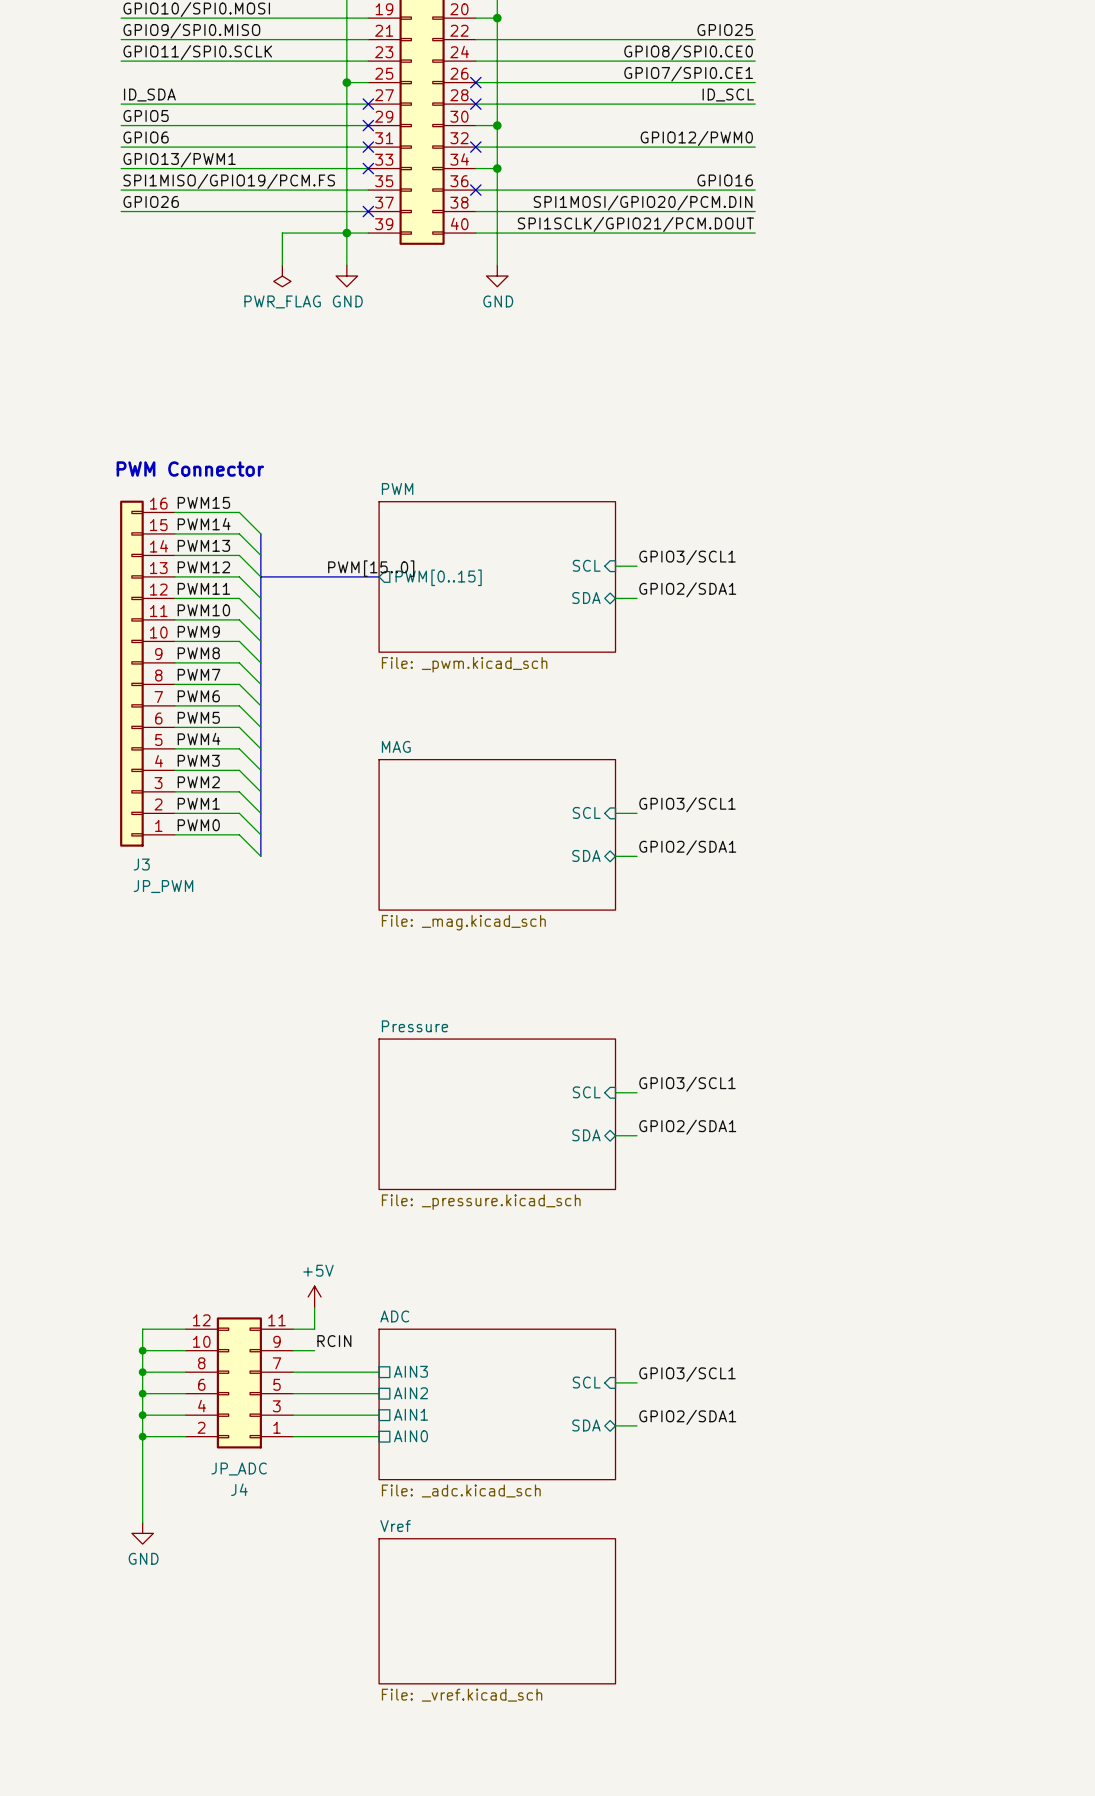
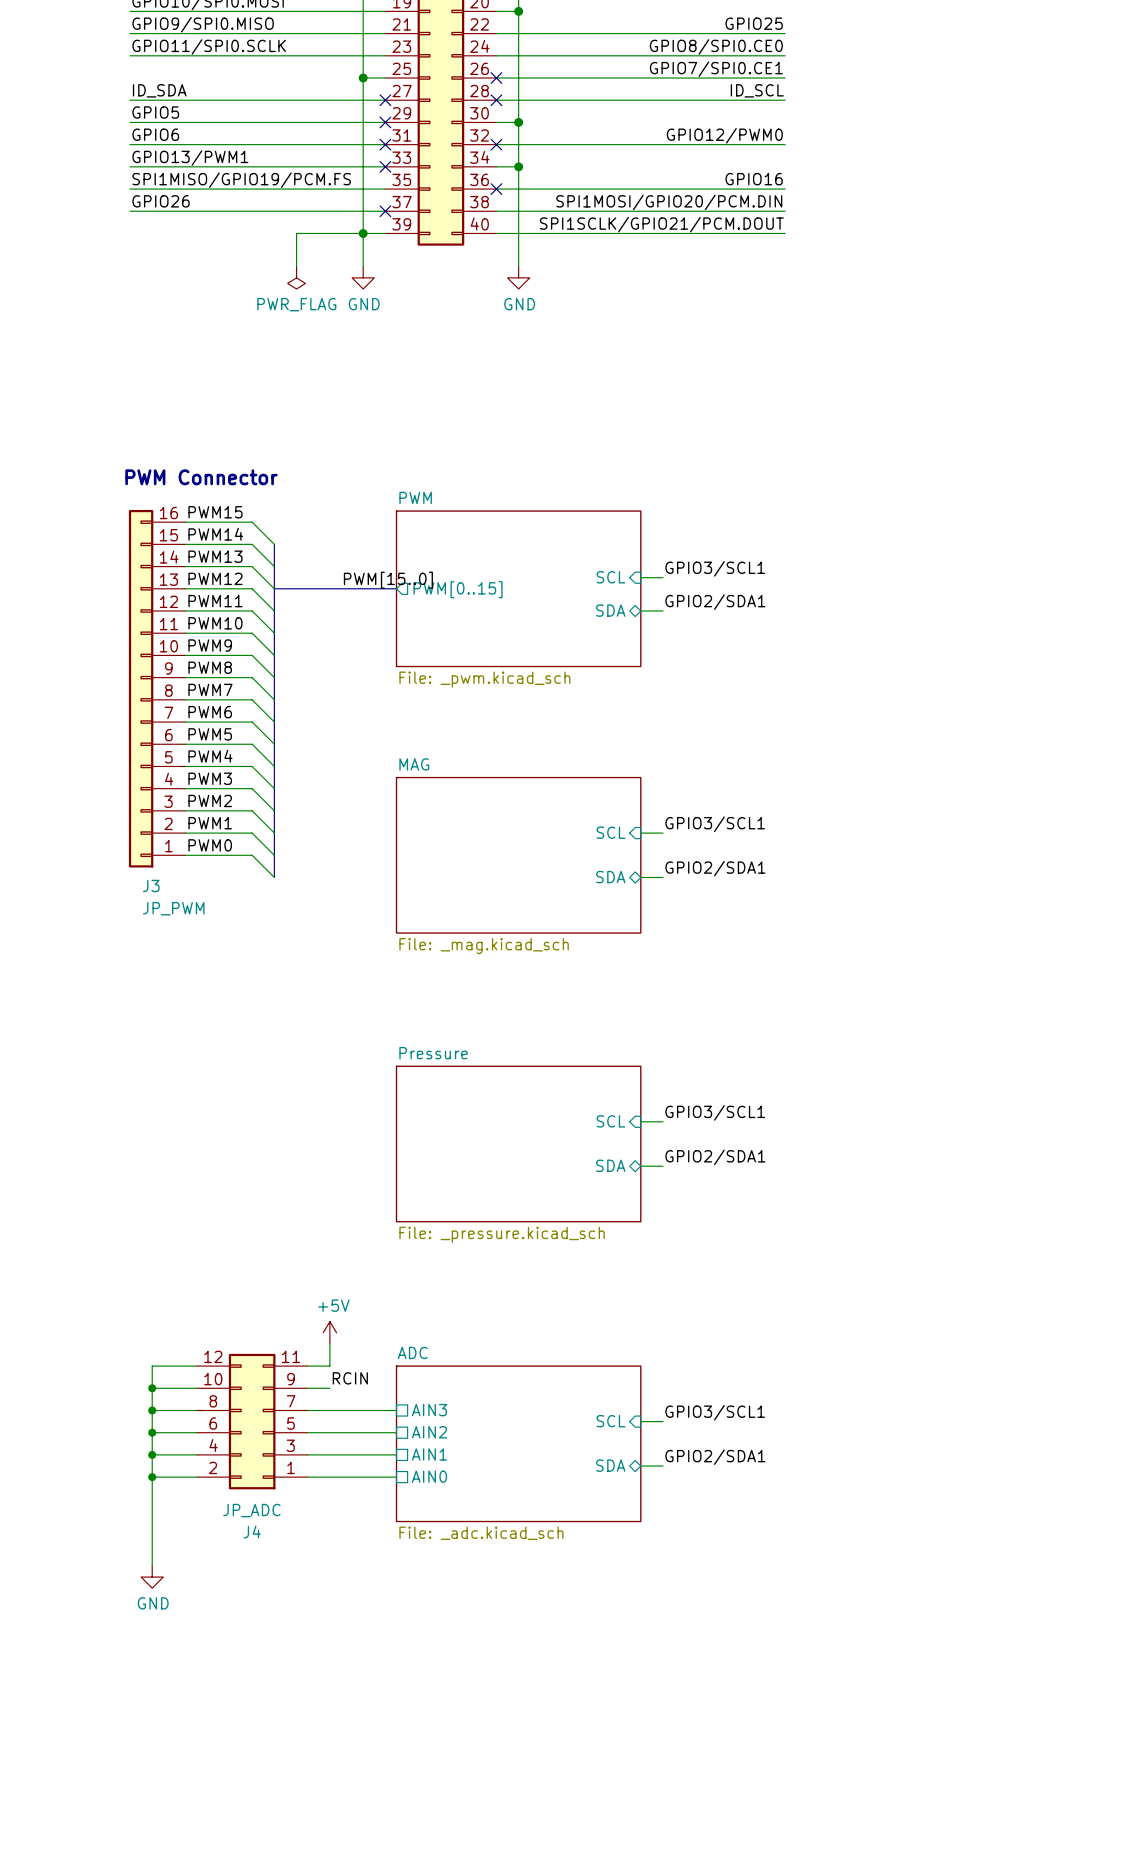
sheet Vref: File: _vref.kicad_sch (497, 1611) -> none

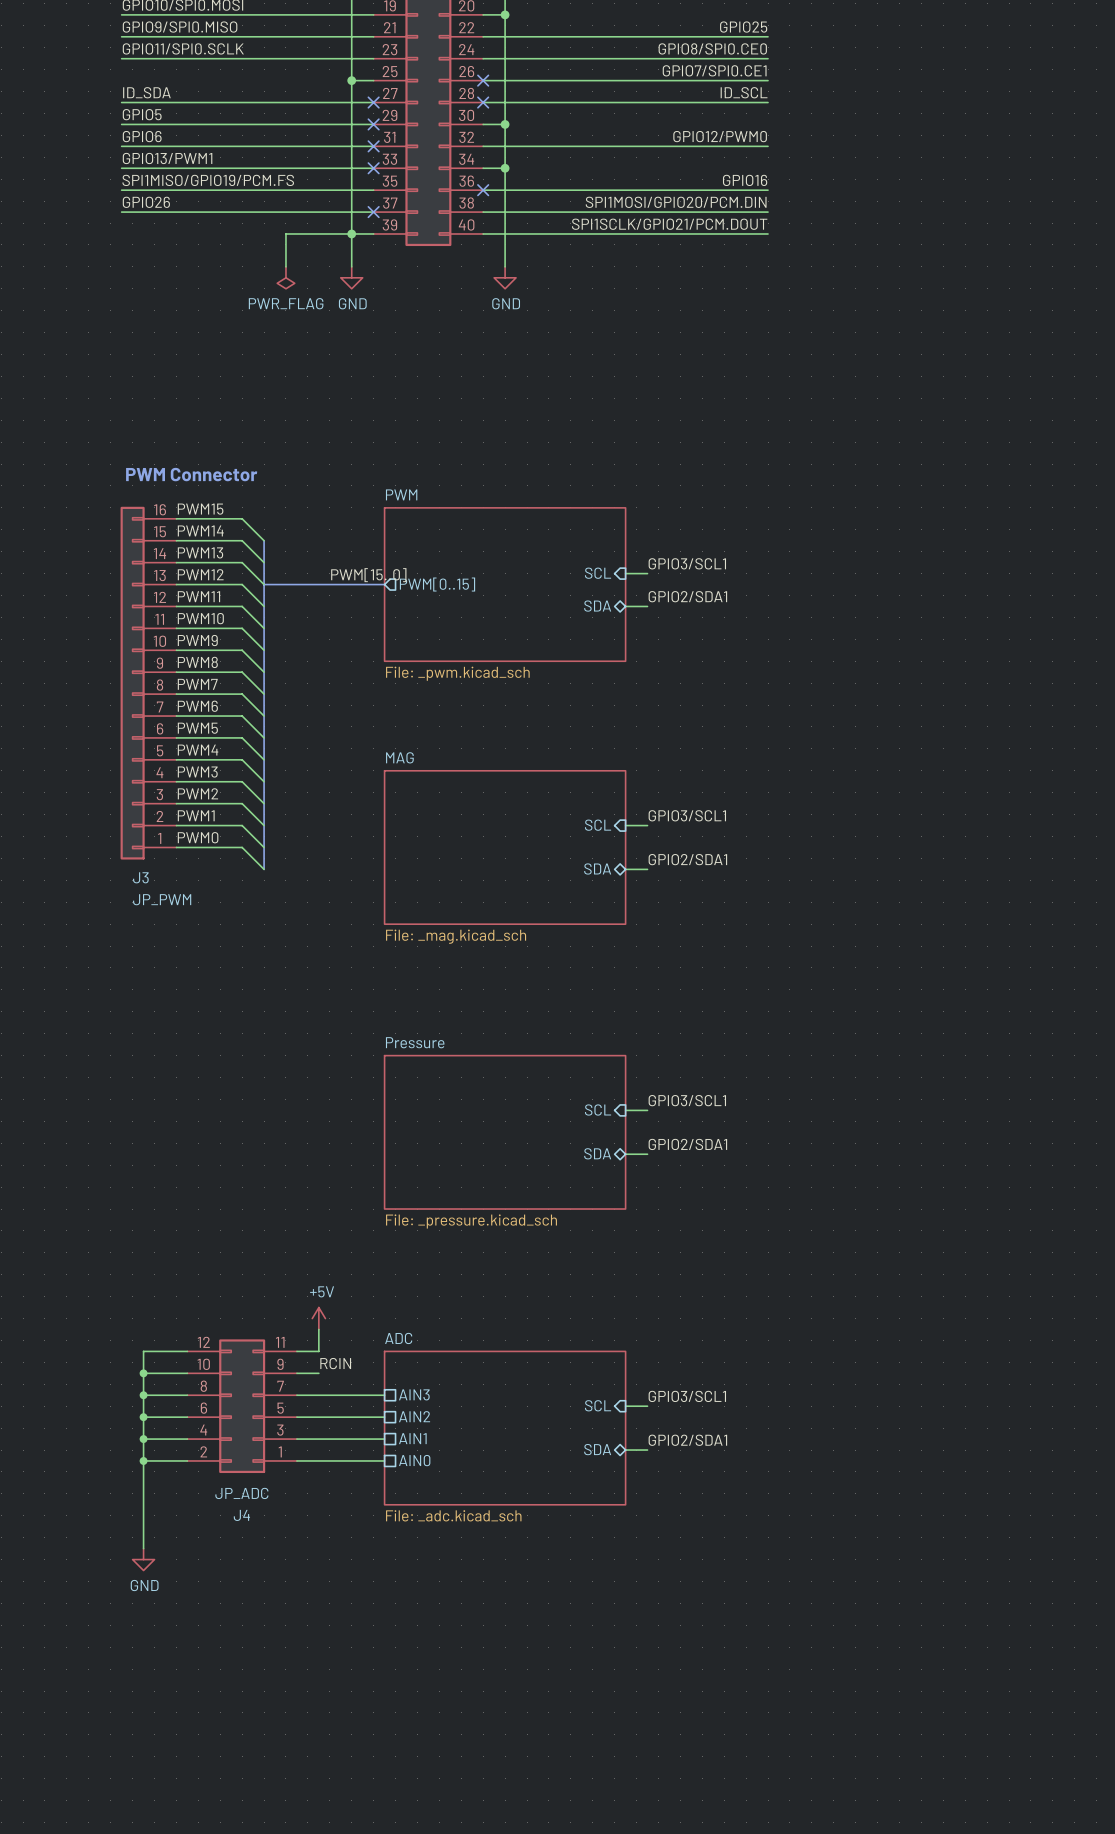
no-connect mark: (496, 144) -> none

